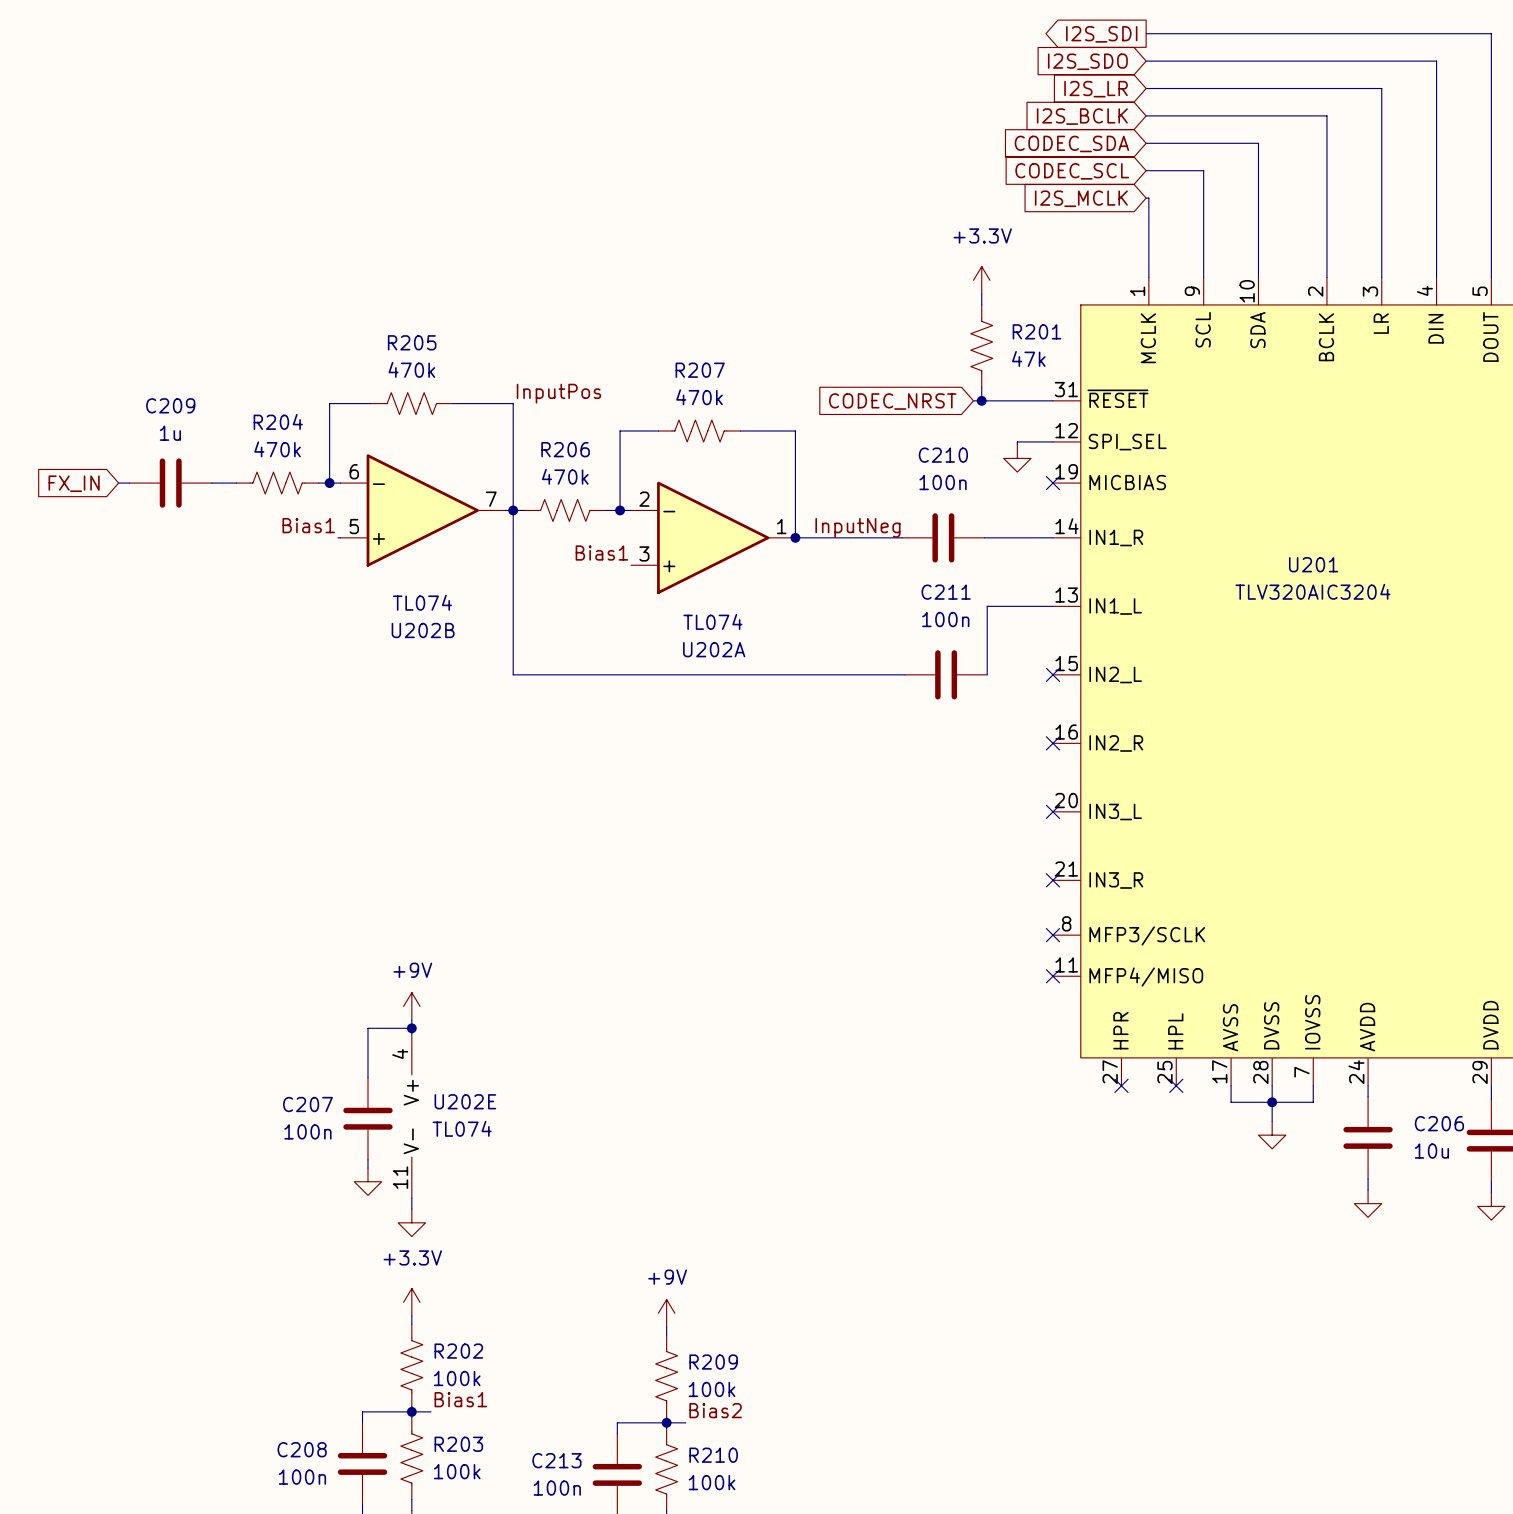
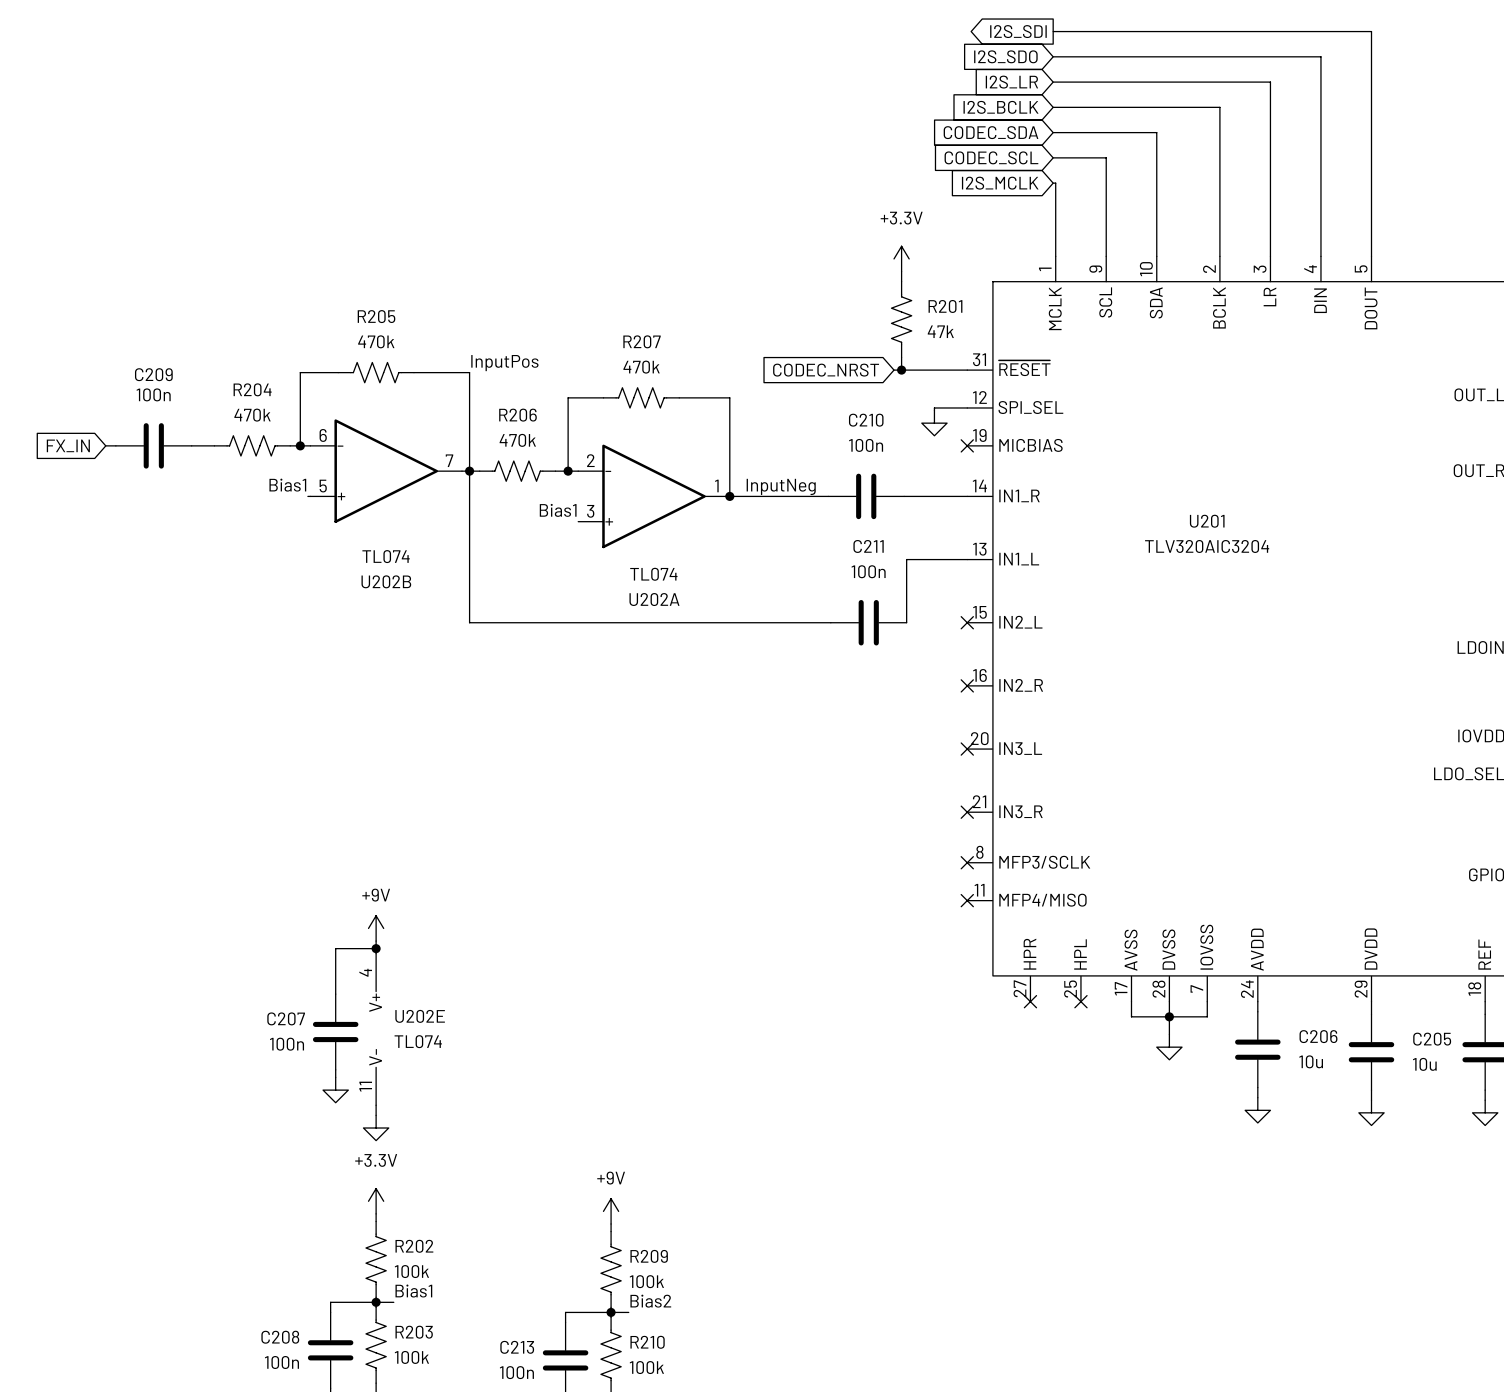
C209 value: 1u (170, 433) -> 100n (153, 394)

